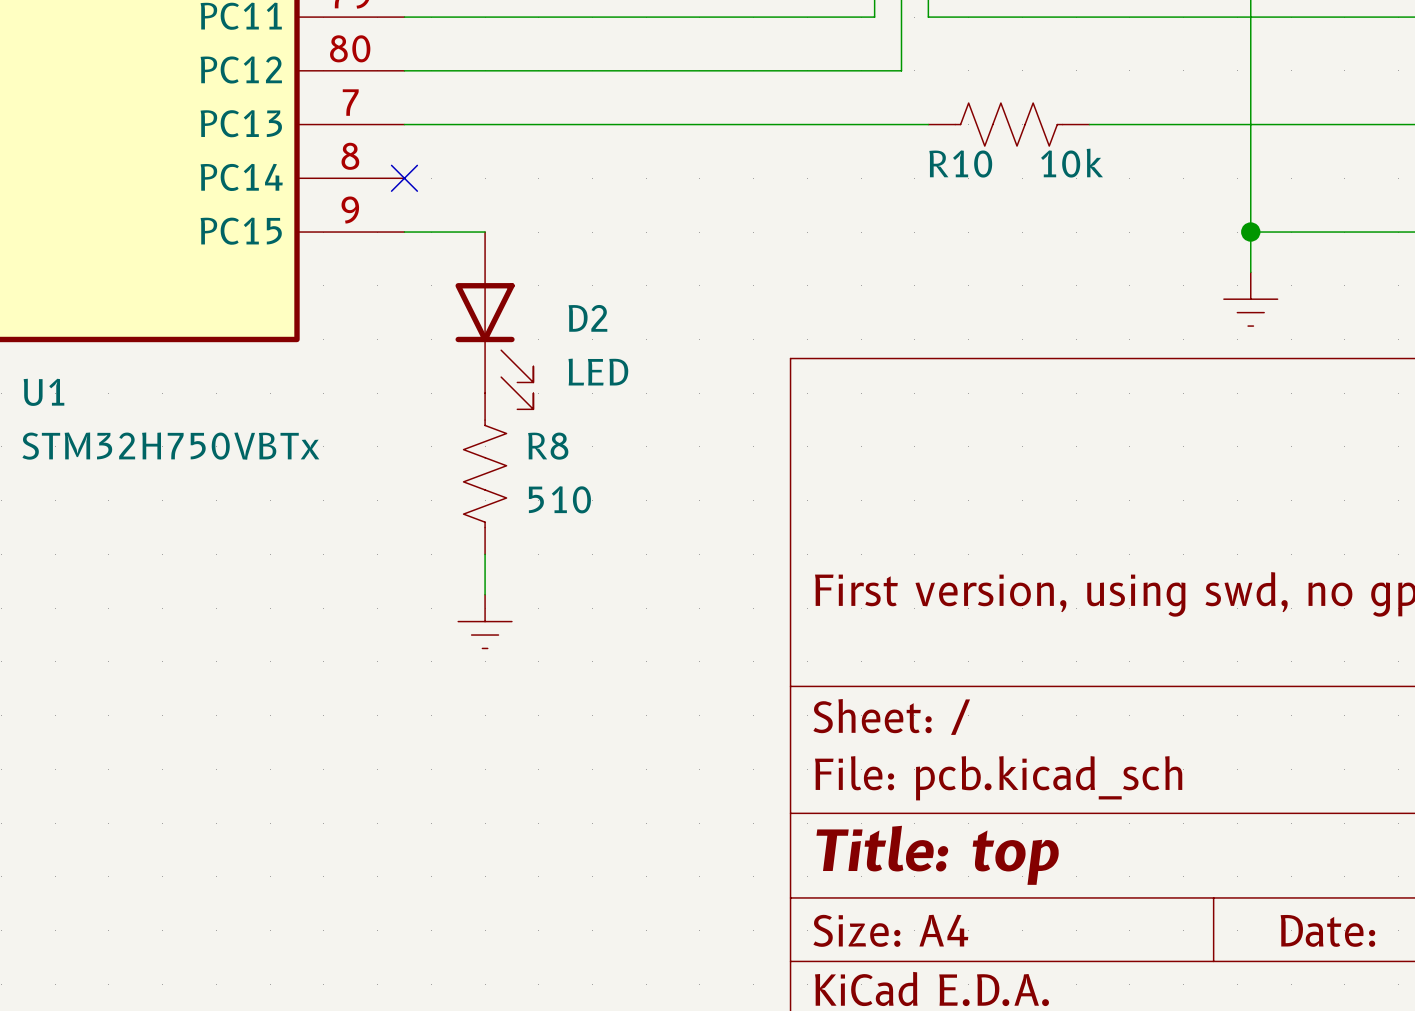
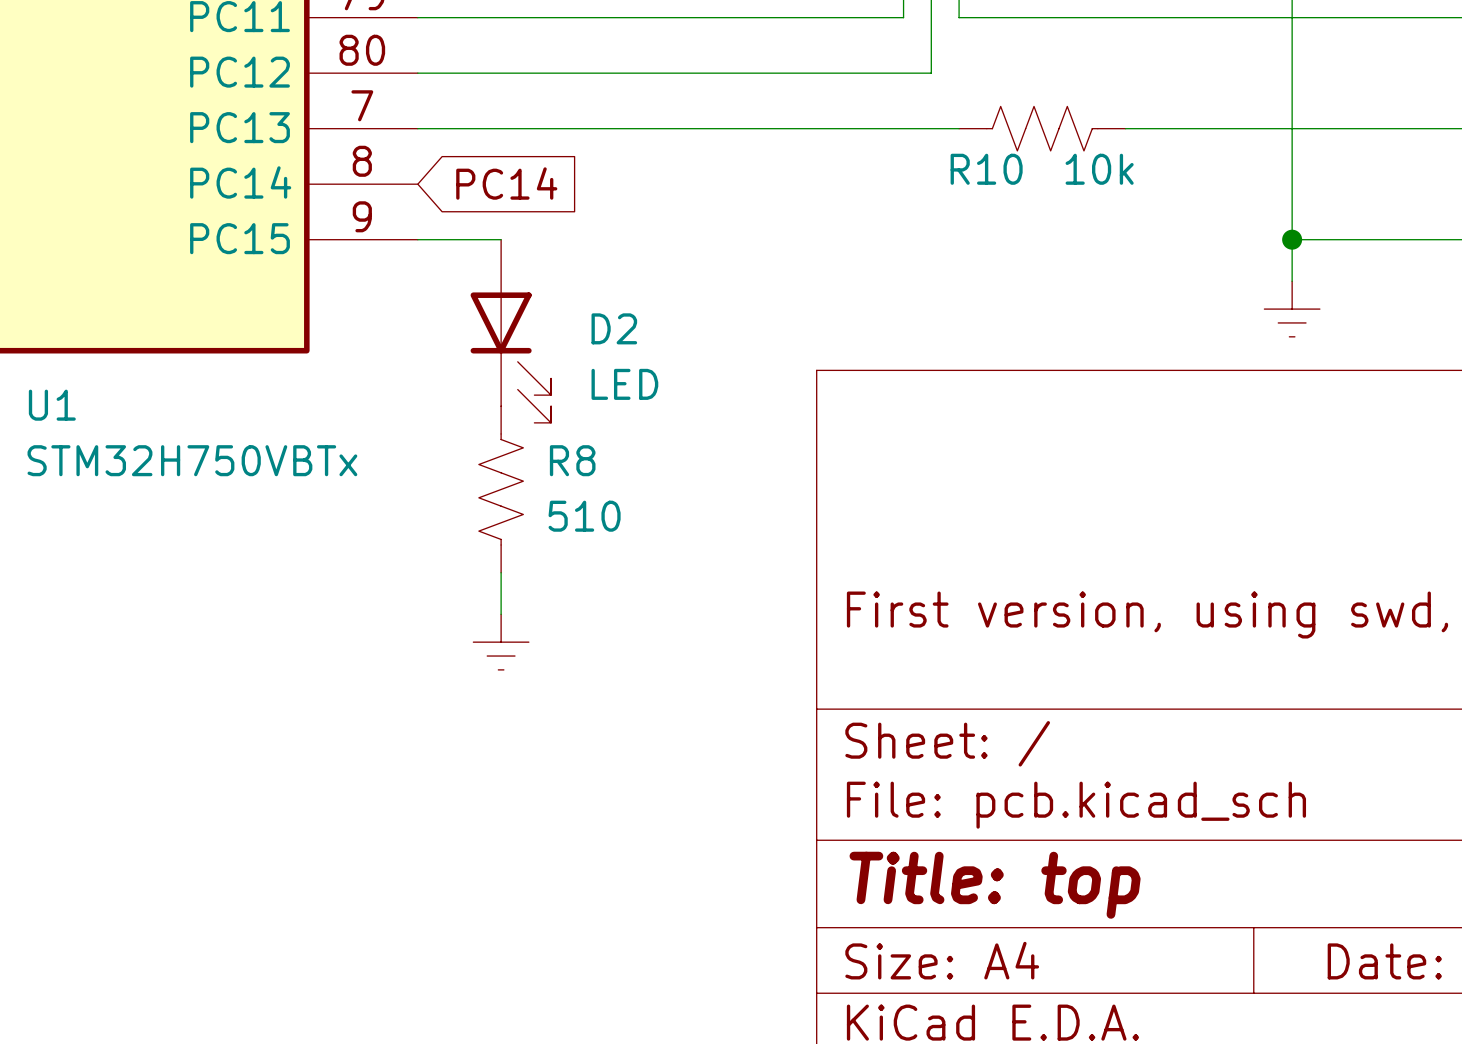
no-connect mark: (404, 178) -> none
global label: none -> PC14 (506, 183)

